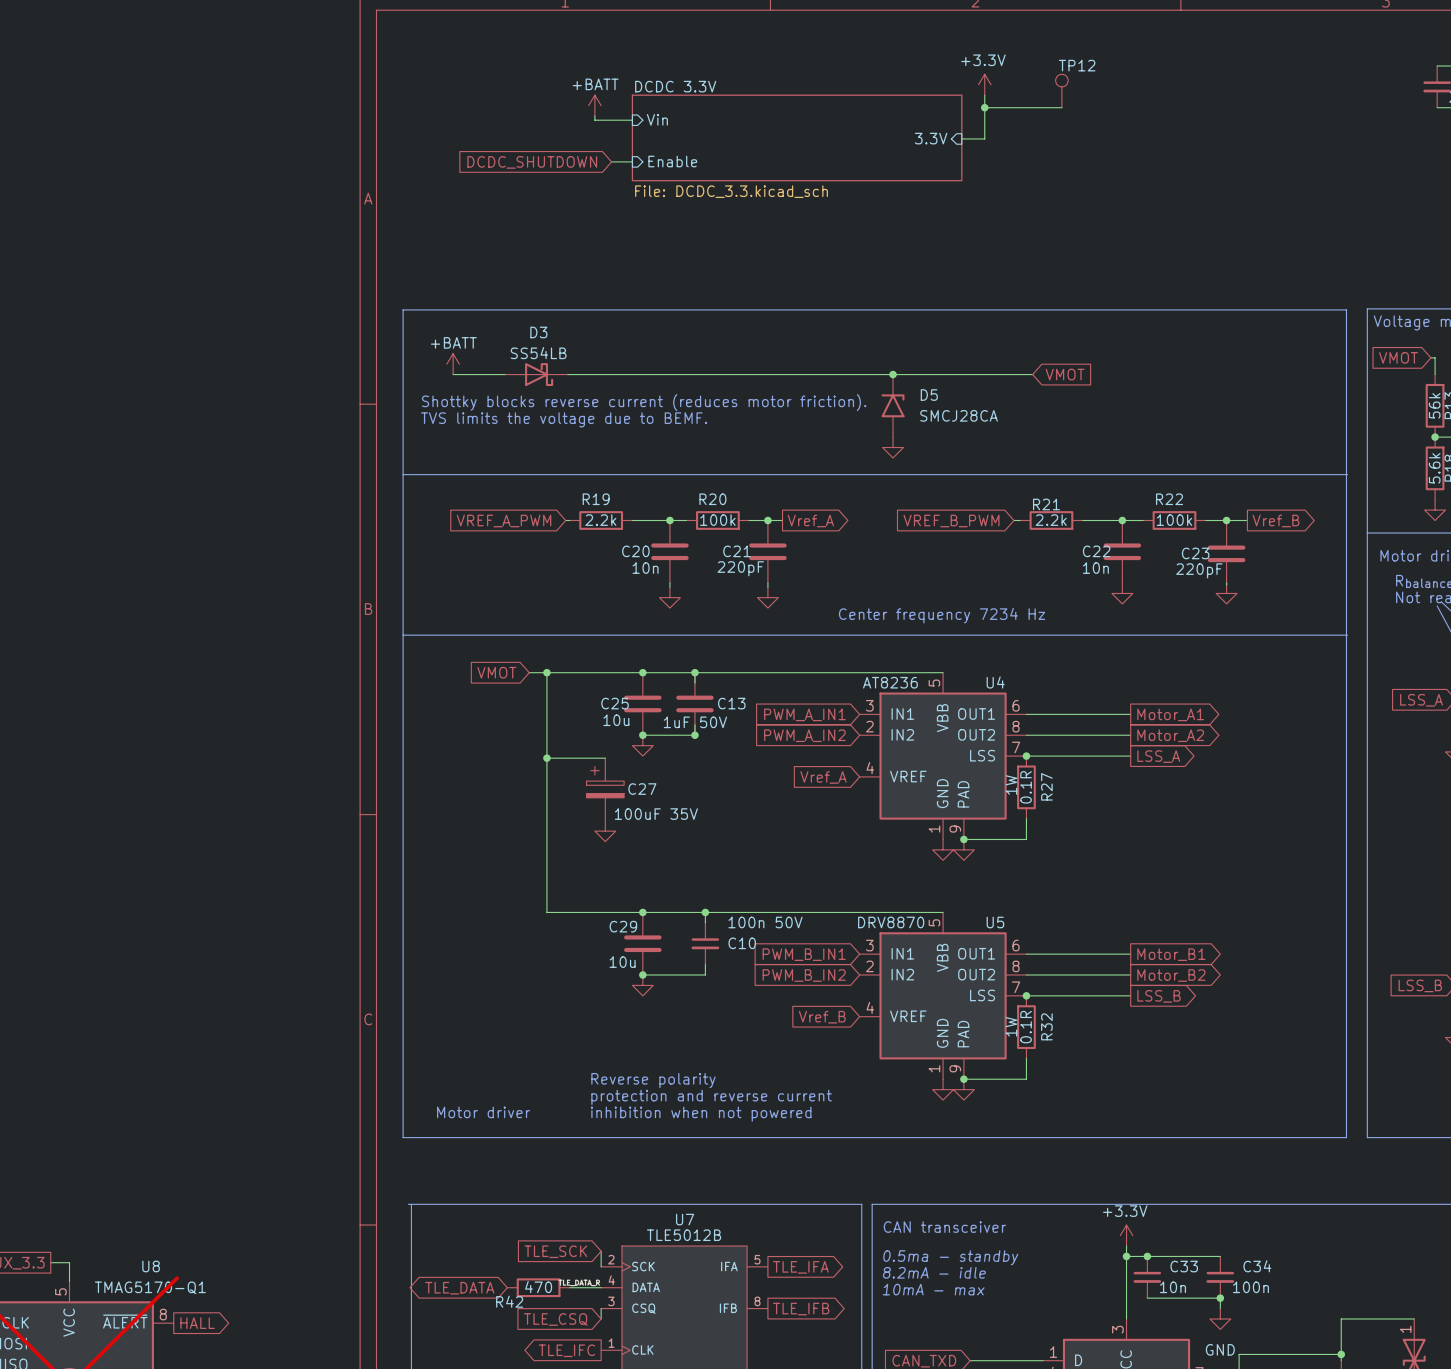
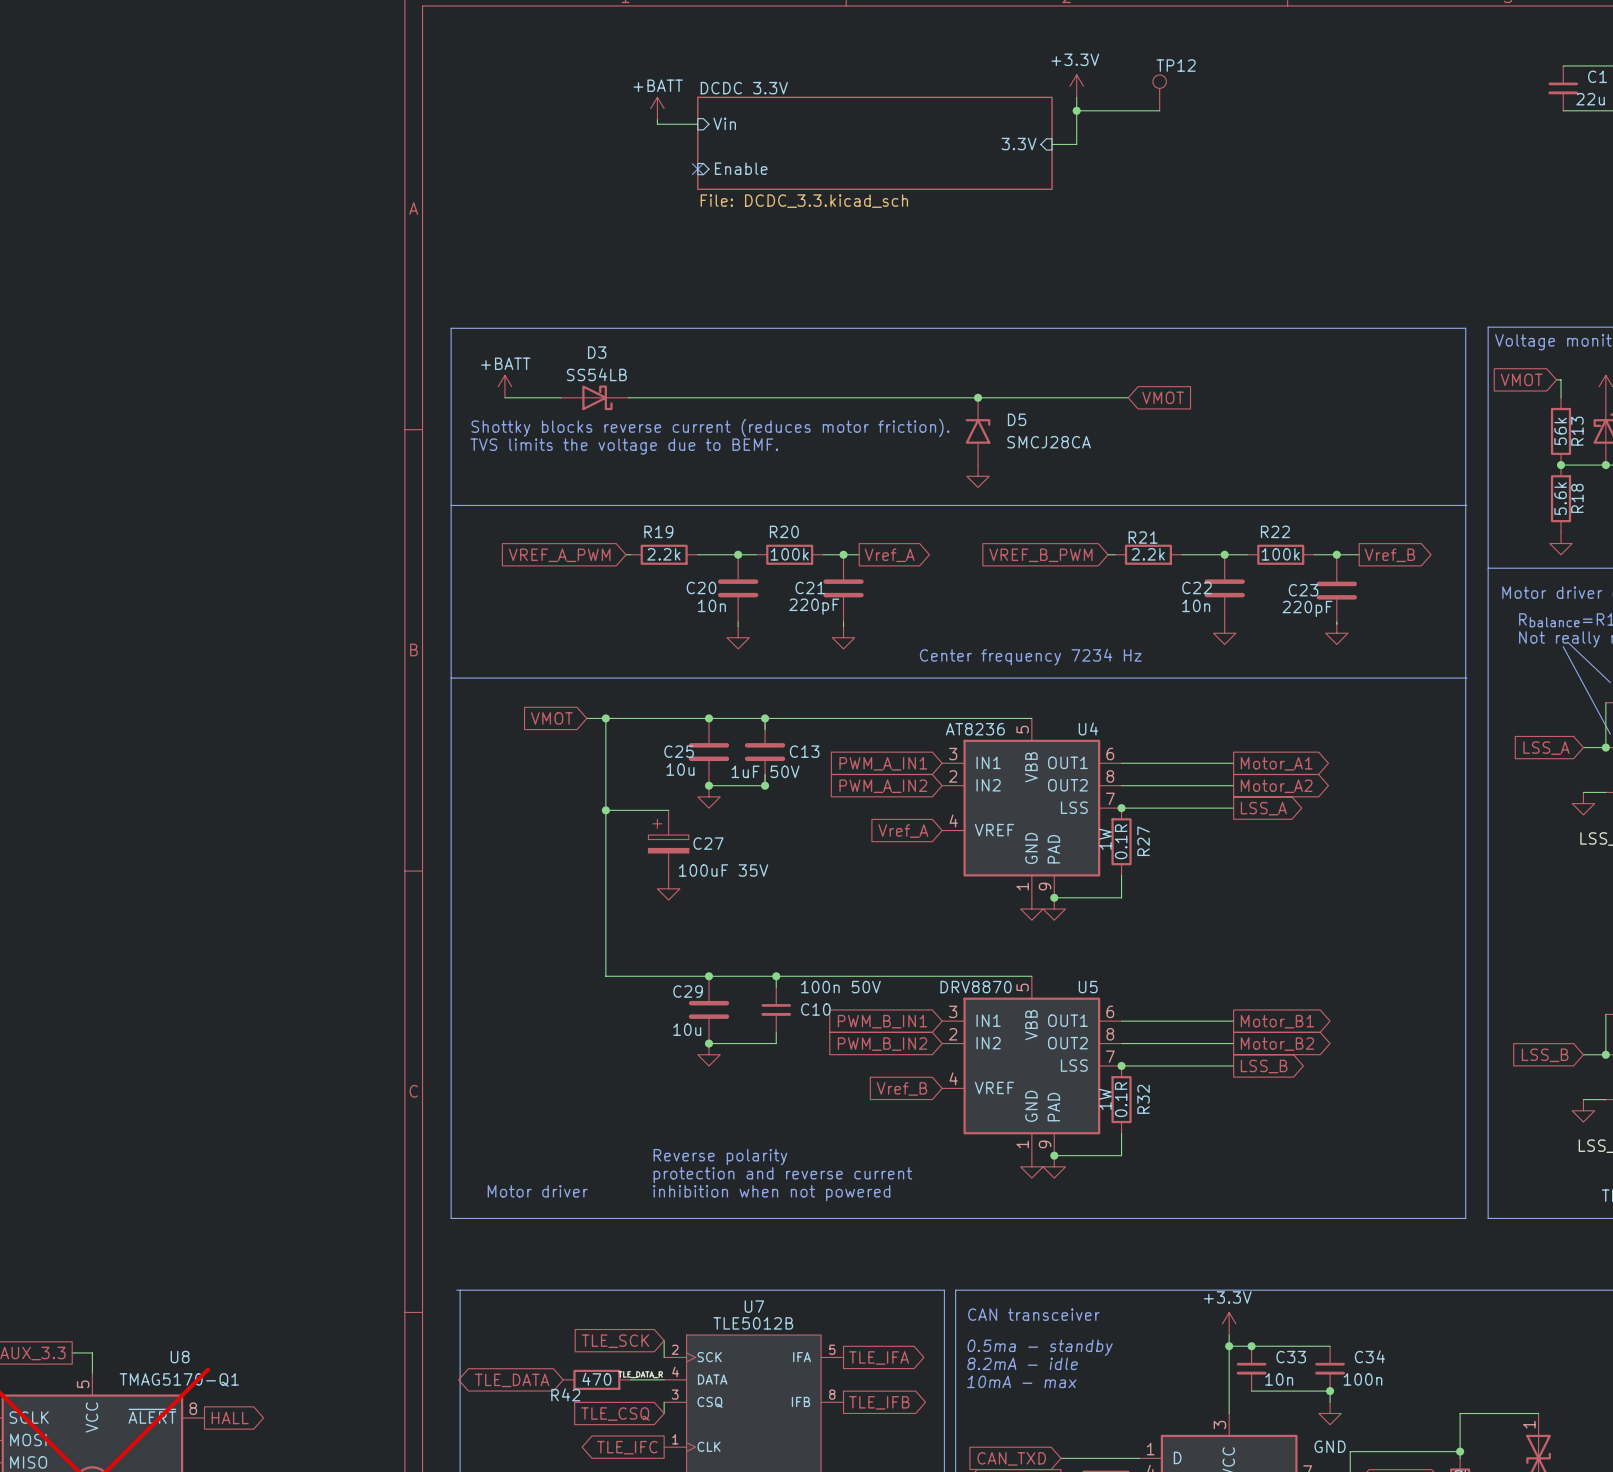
wire: (611, 161) (632, 161) -> none
no-connect mark: none -> (697, 169)
global label: DCDC_SHUTDOWN (532, 162) -> none

